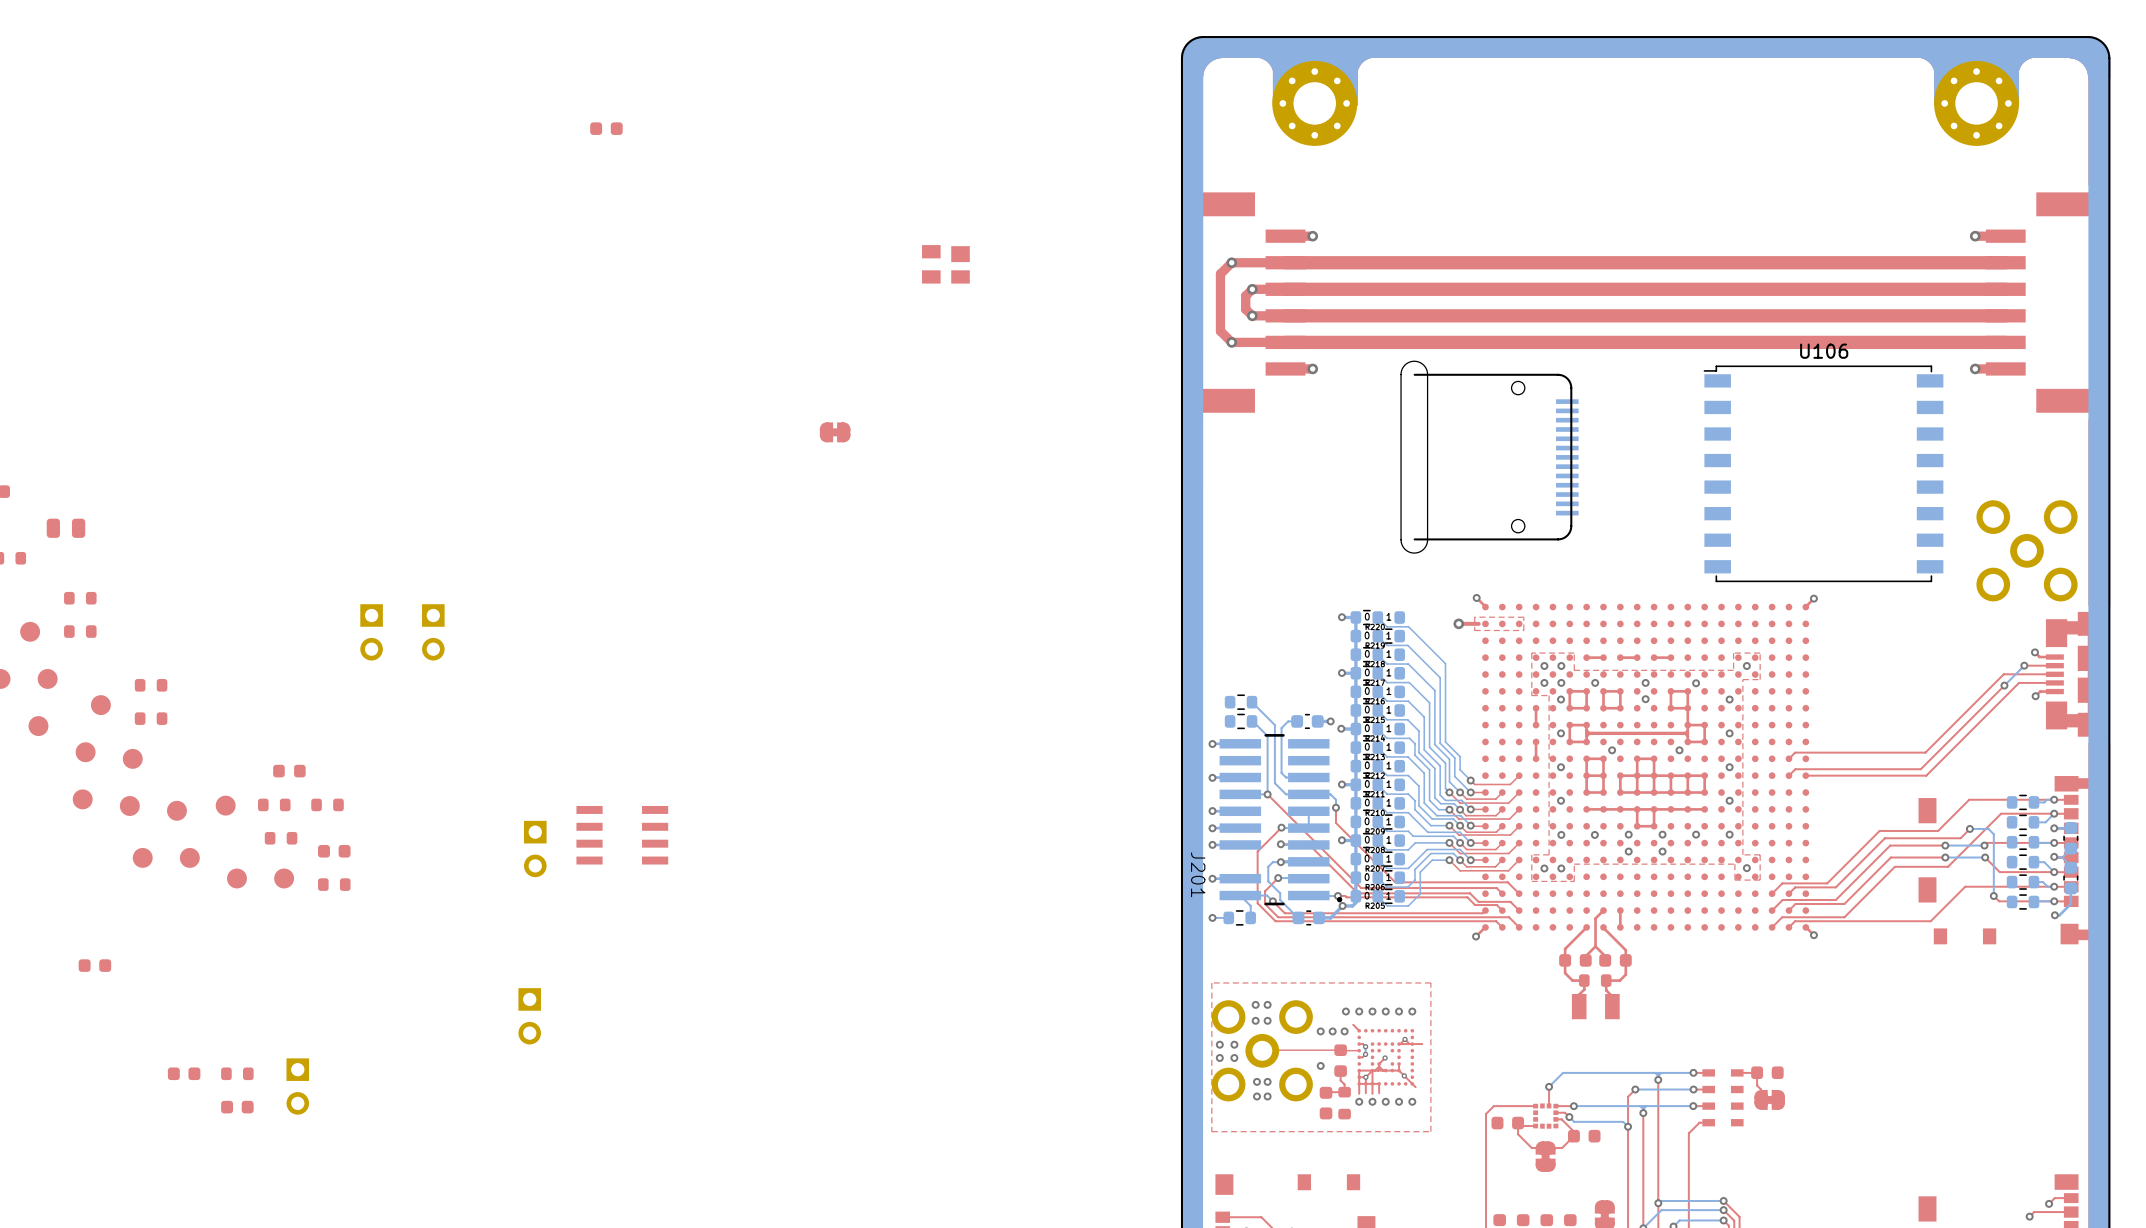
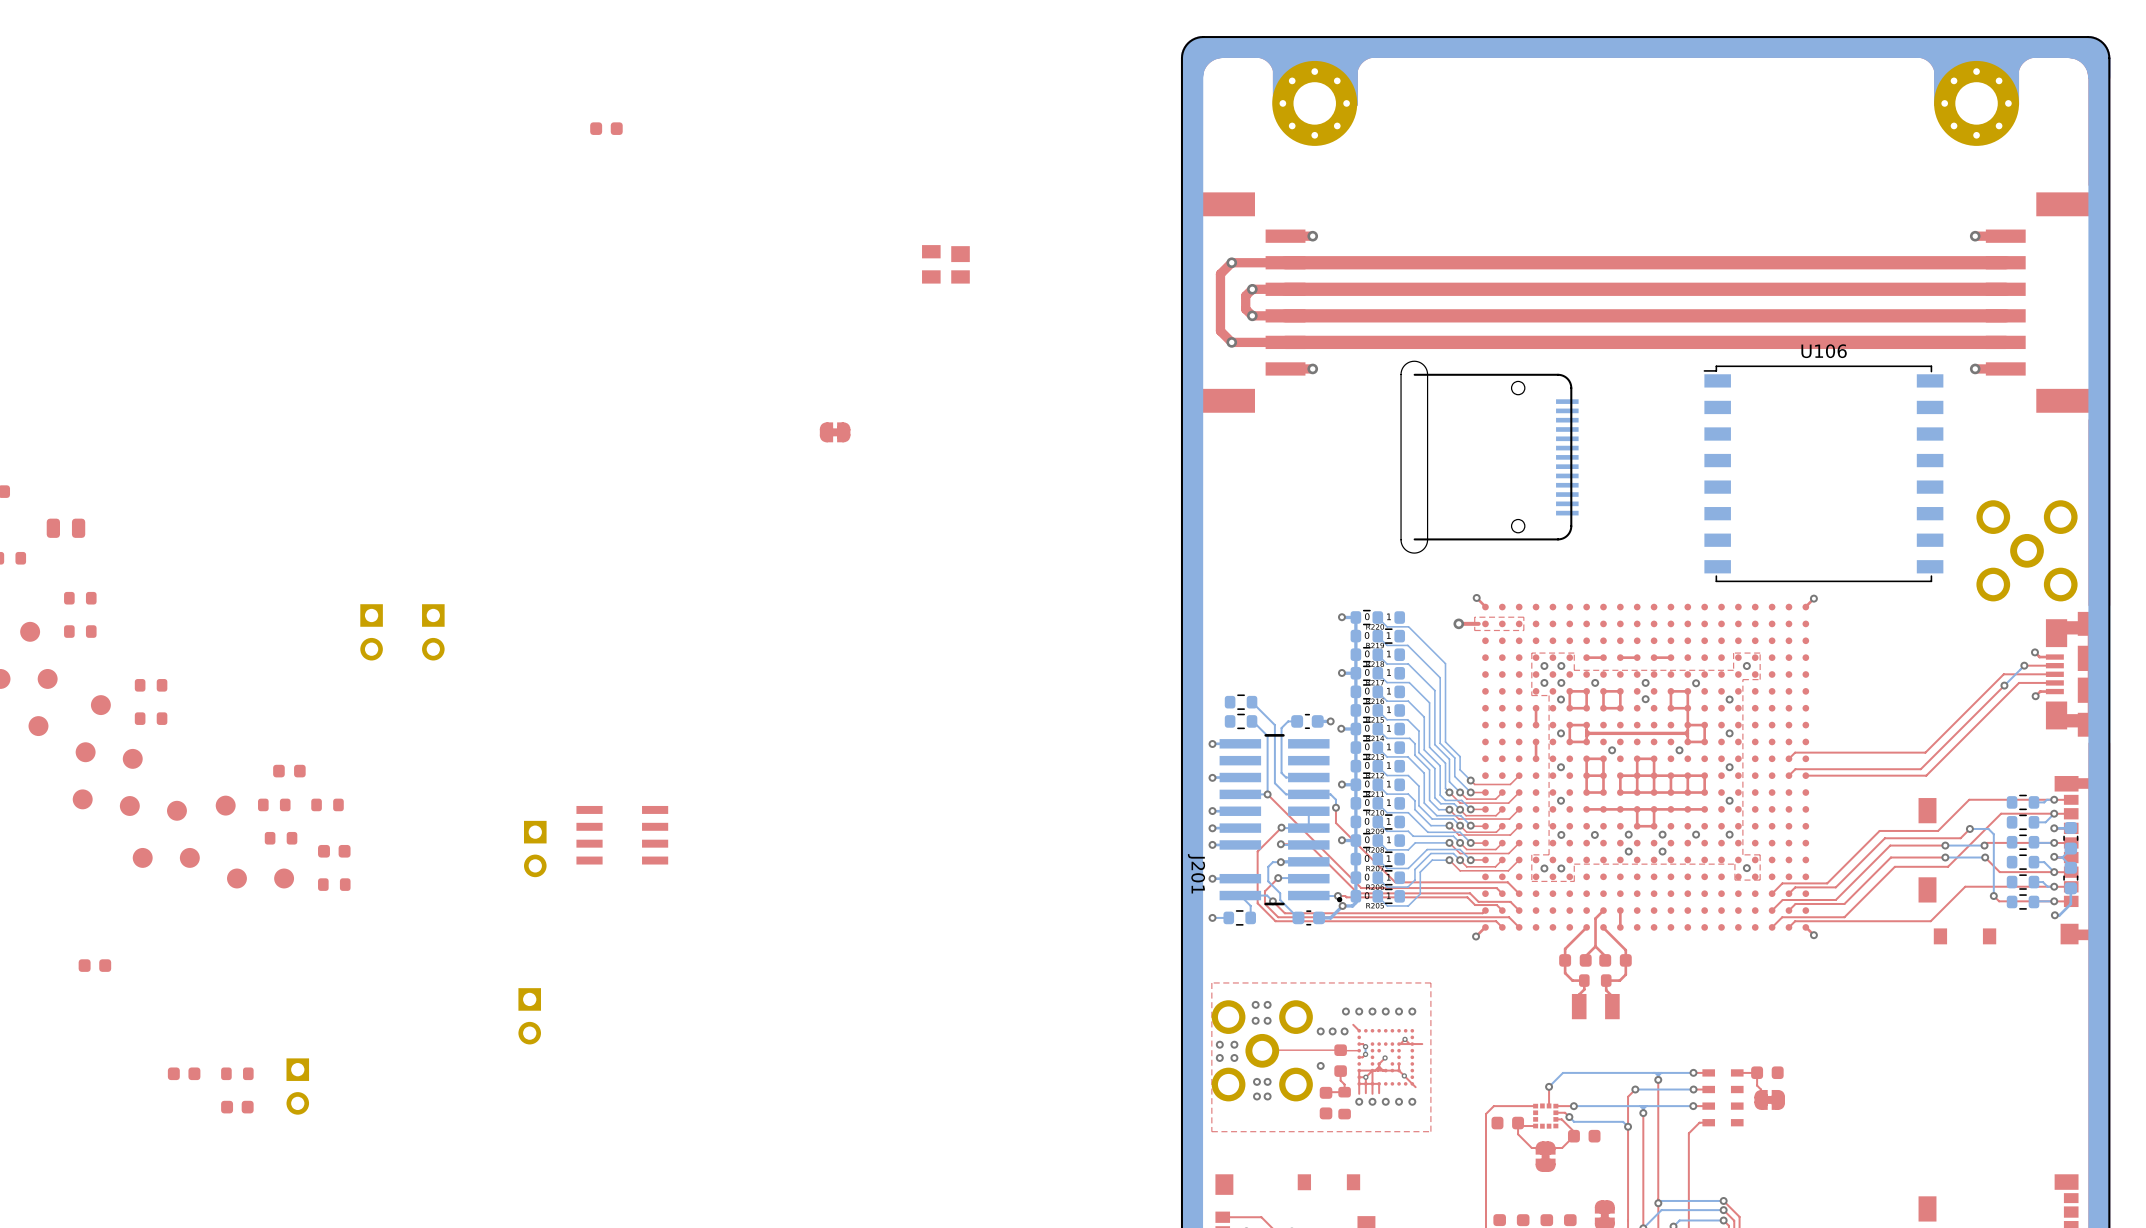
top track: (2071, 1198) (2054, 1198) (2049, 1203) -> none
via: (2049, 1203) -> none
top track: (2071, 1212) (2034, 1212) (2029, 1216) -> none
via: (2029, 1216) -> none

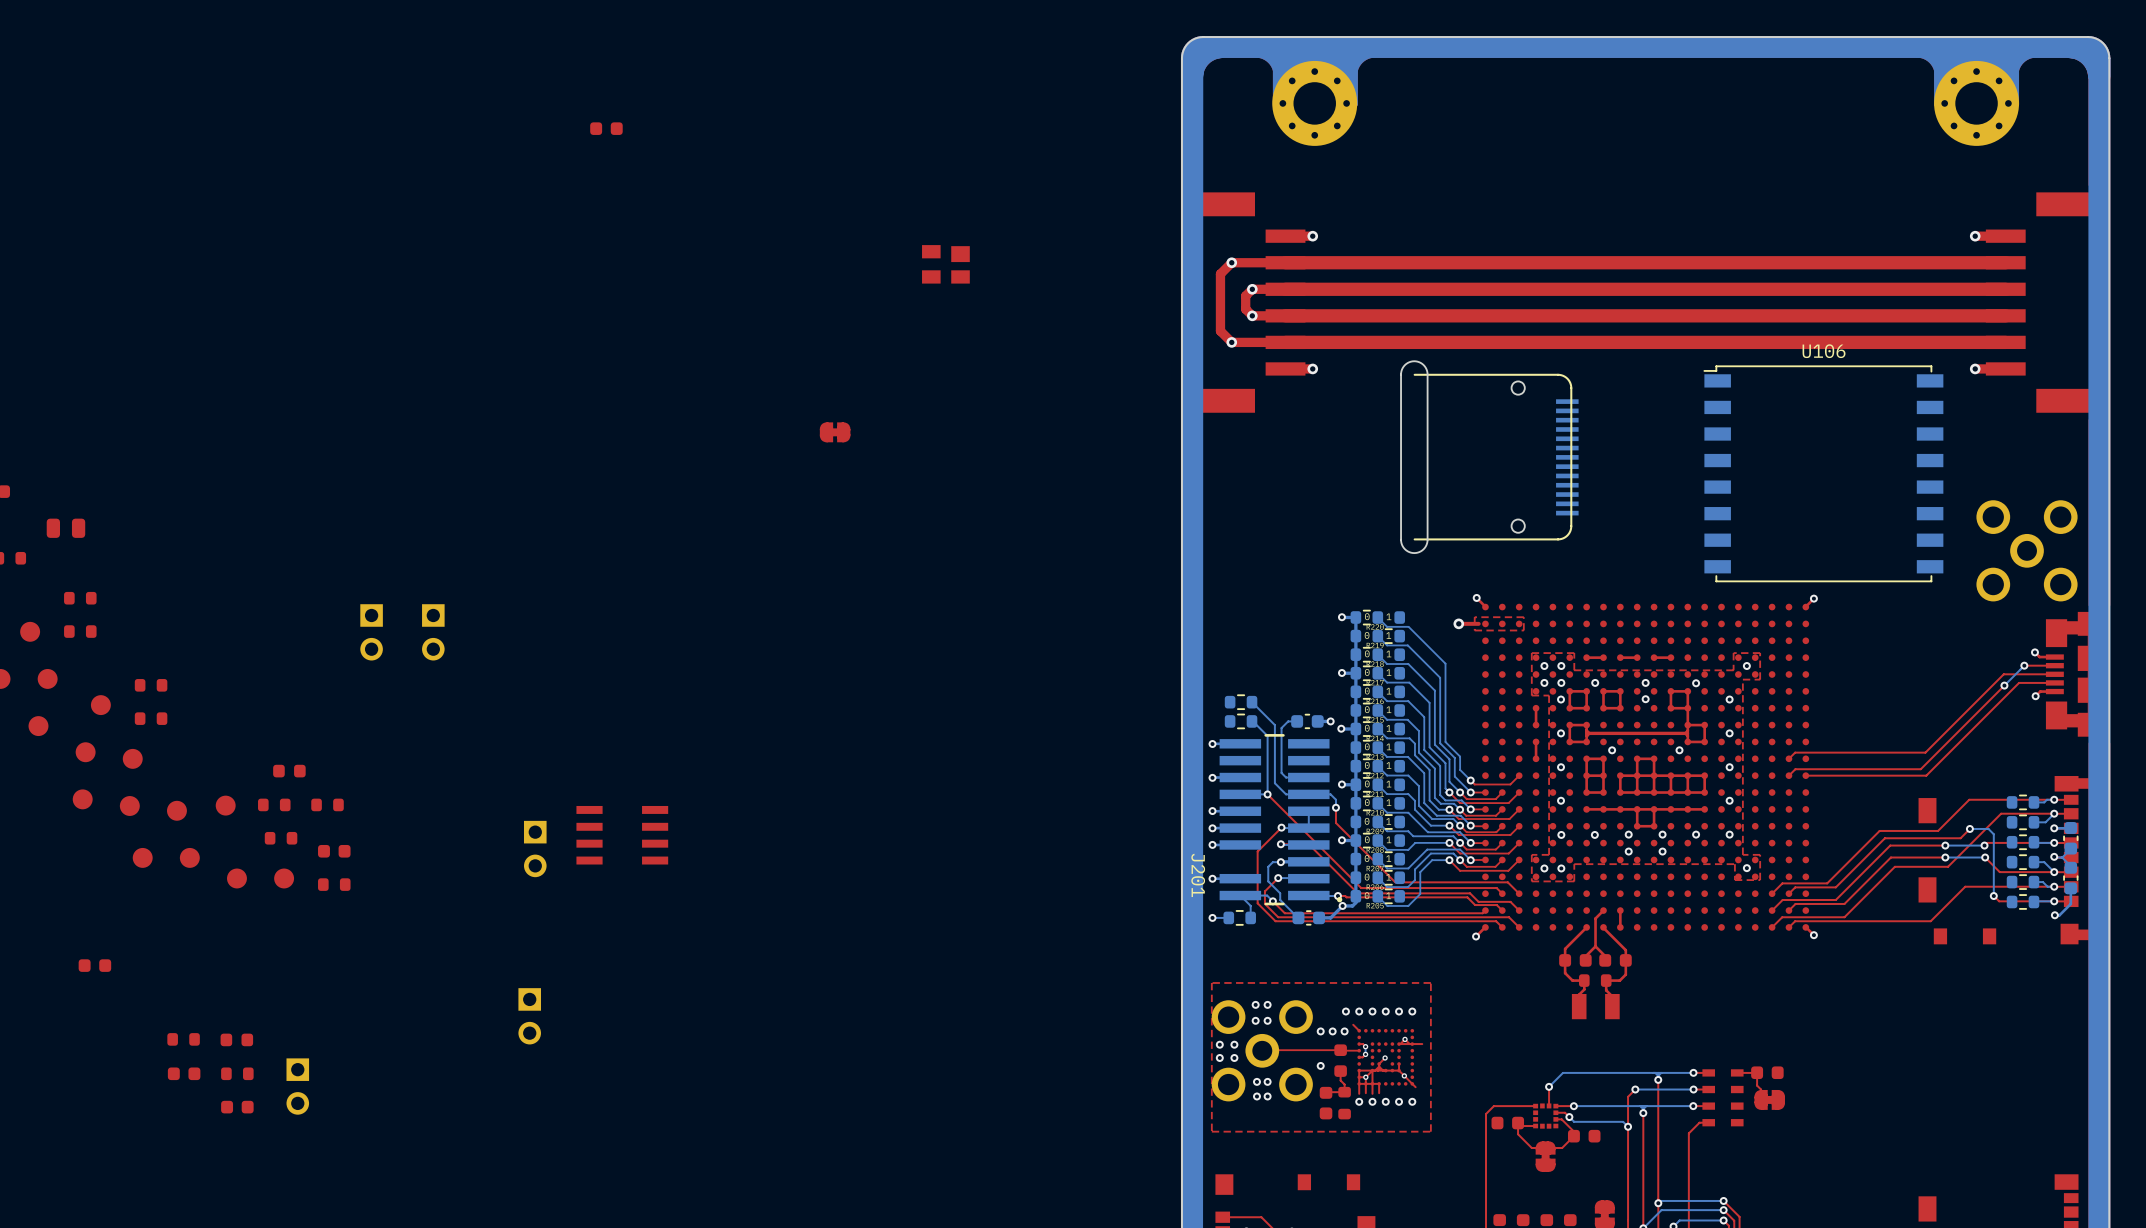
part: none -> (183, 1039)
part: none -> (236, 1039)

